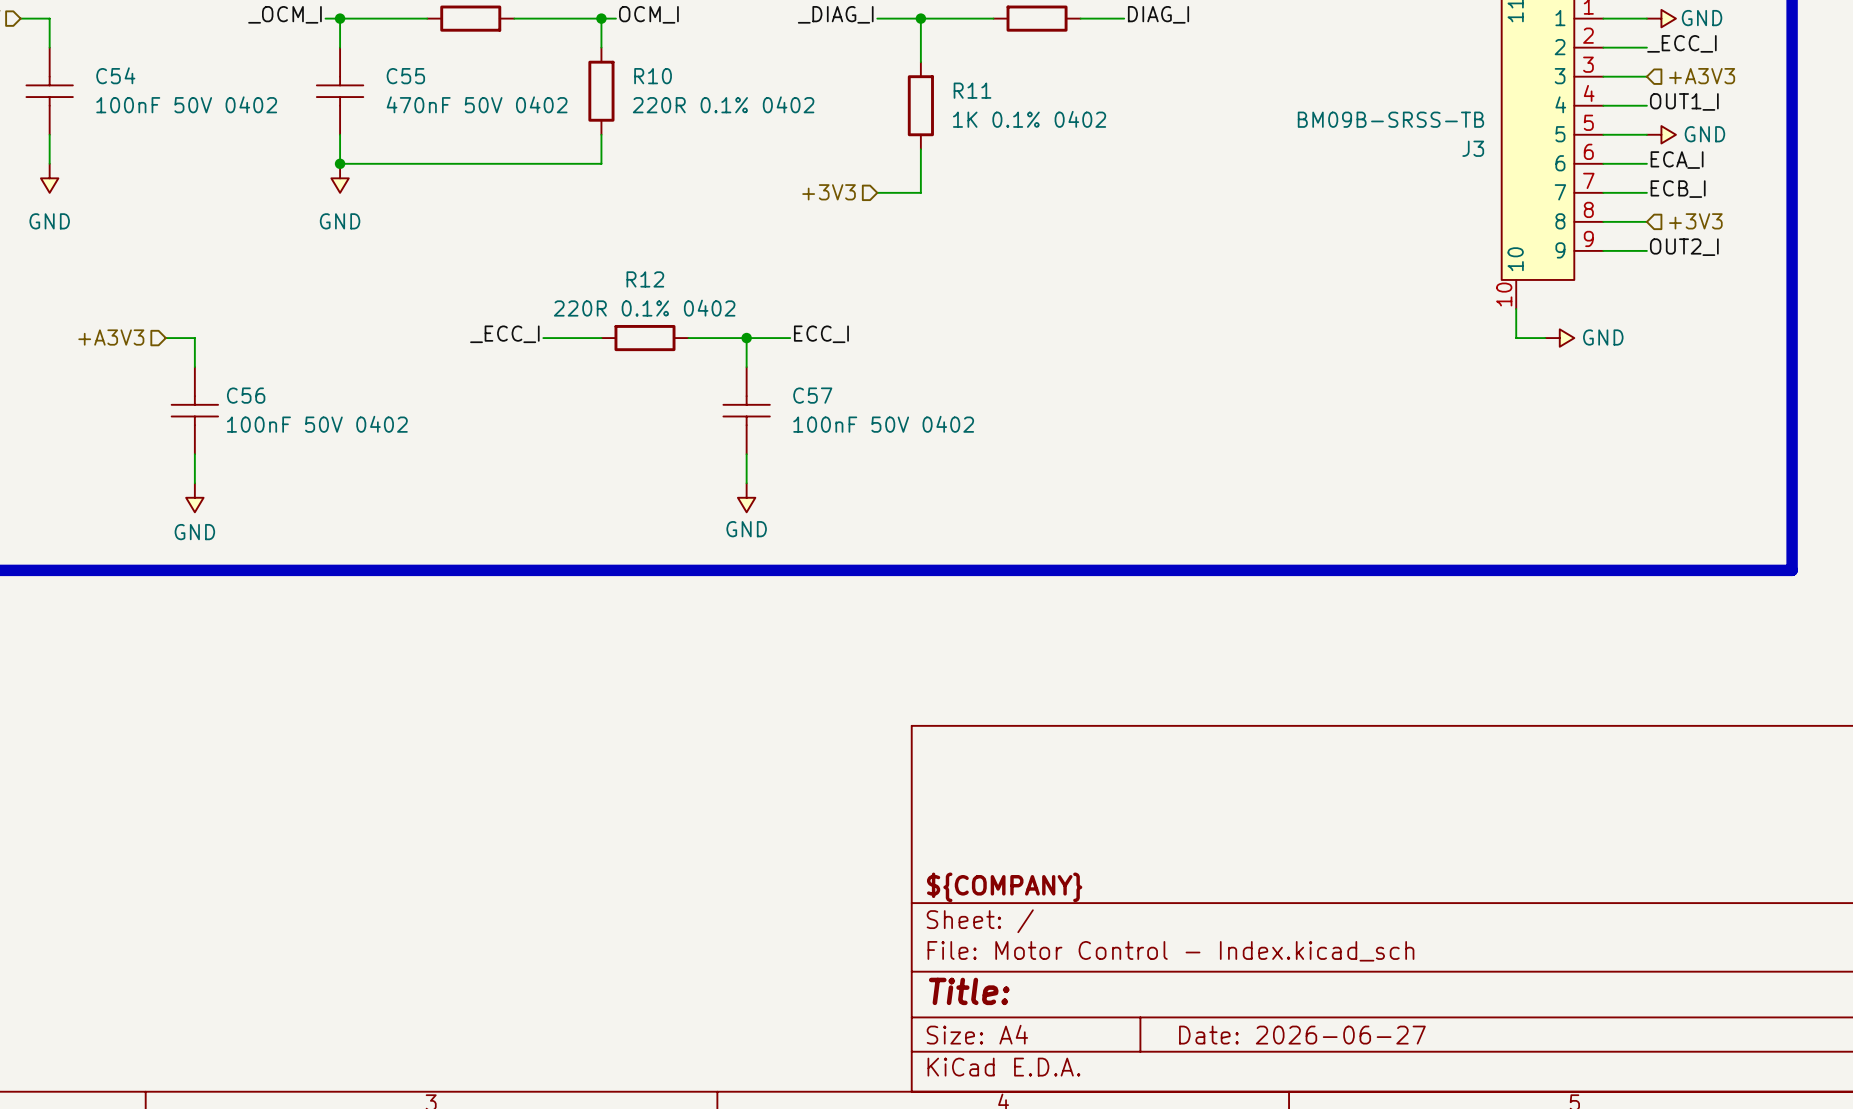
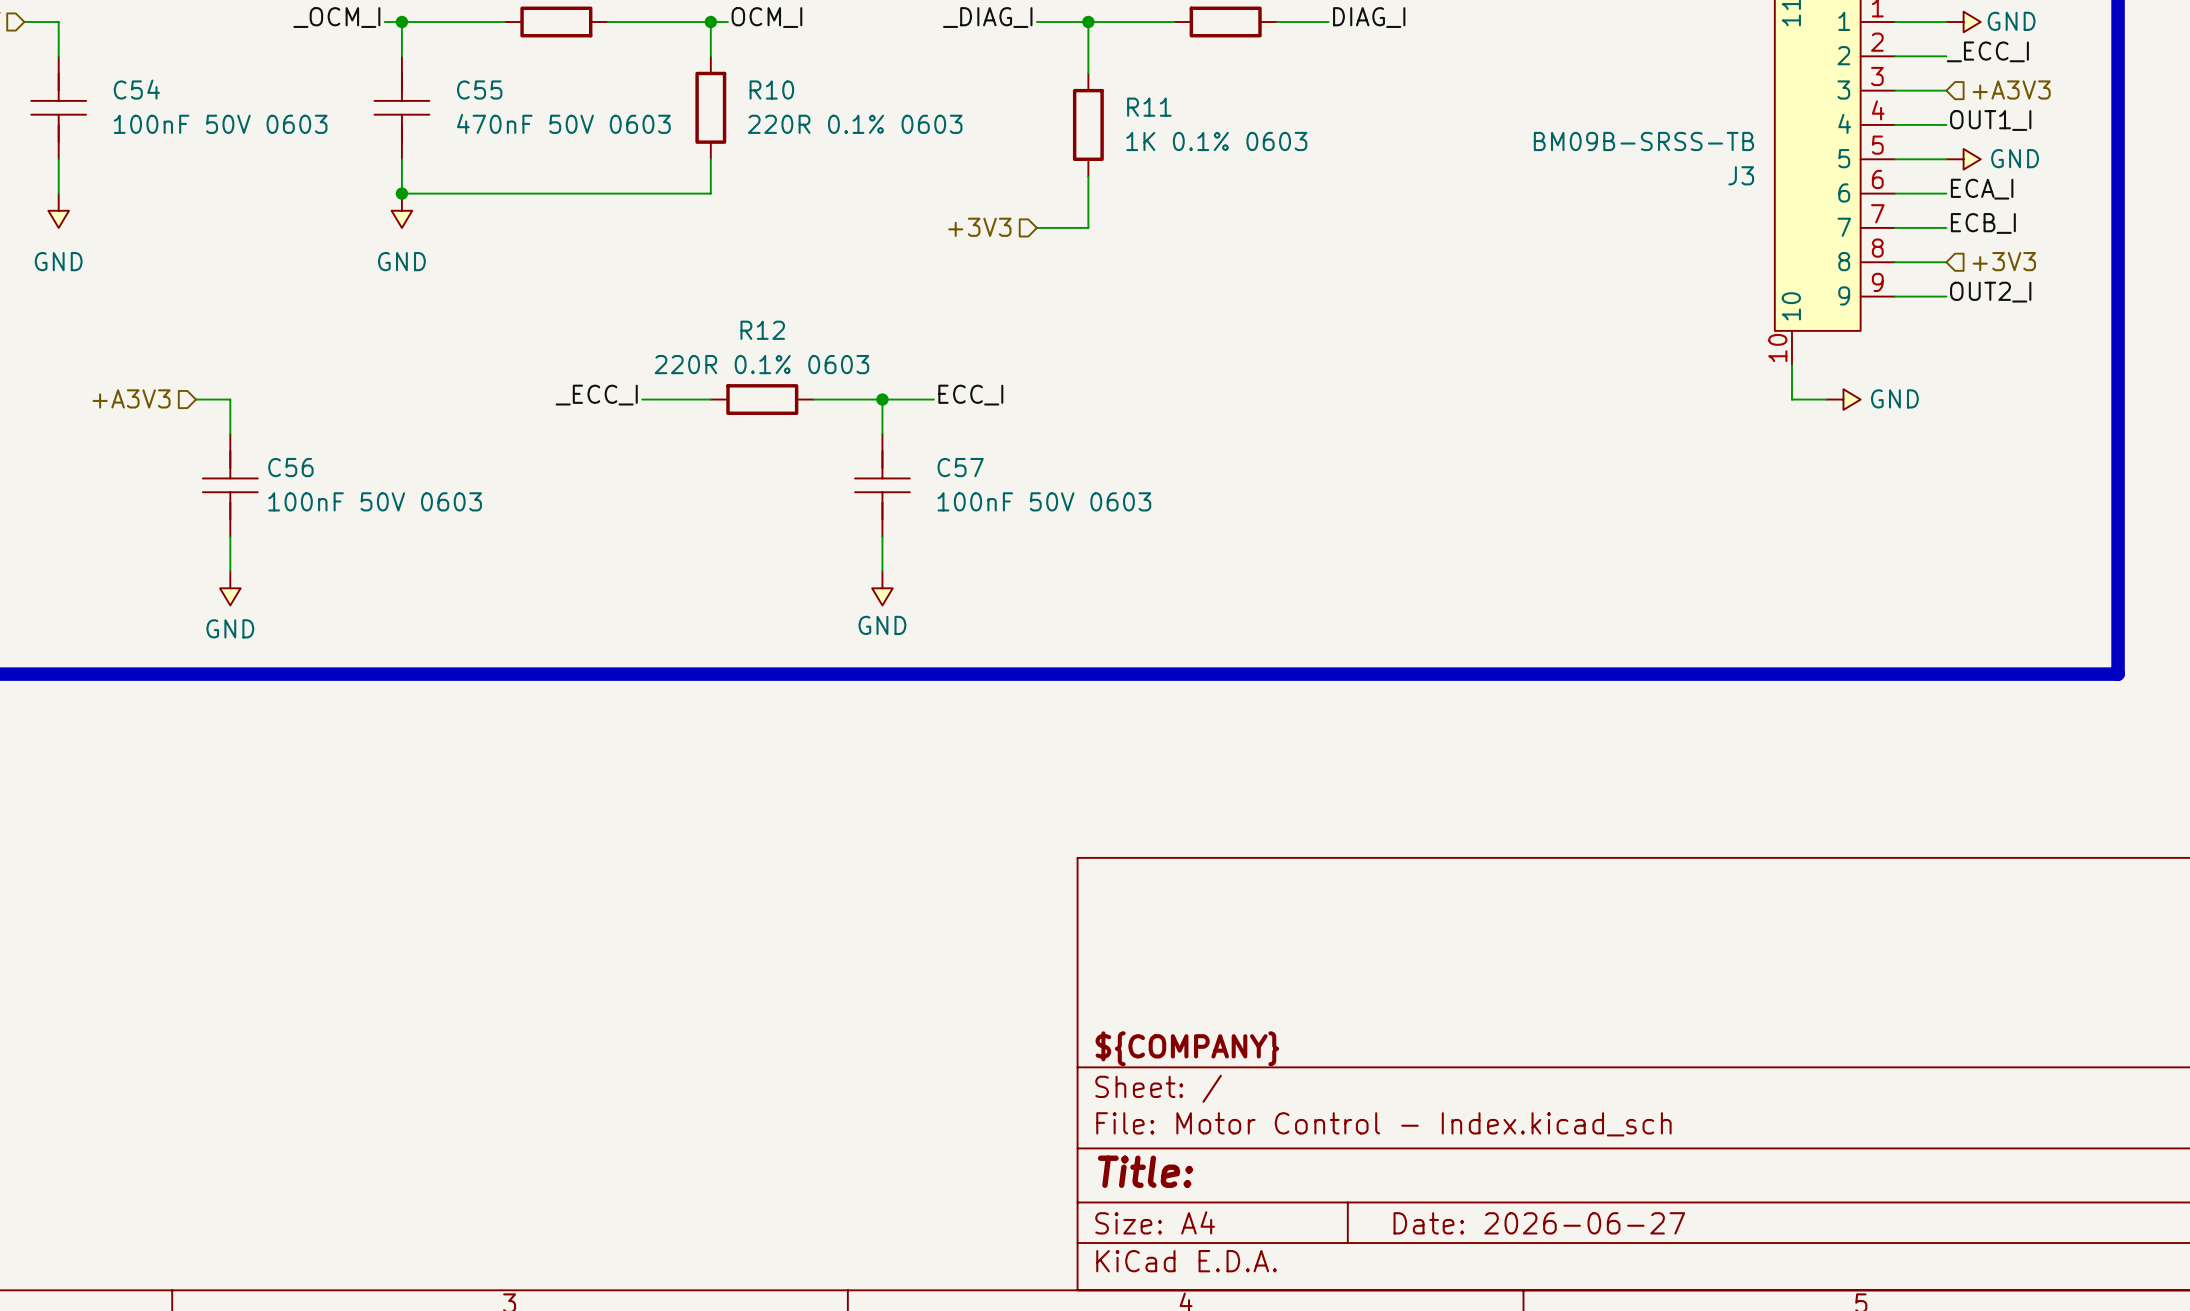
C54 symbol: [26, 47, 73, 135] -> [31, 56, 87, 160]
C55 symbol: [316, 47, 364, 135] -> [374, 56, 430, 160]
C54 value: 100nF 50V 0402 (186, 104) -> 100nF 50V 0603 (220, 124)
C55 value: 470nF 50V 0402 (477, 104) -> 470nF 50V 0603 (563, 123)
R10 value: 220R 0.1% 0402 (723, 104) -> 220R 0.1% 0603 (855, 124)
R11 value: 1K 0.1% 0402 (1029, 119) -> 1K 0.1% 0603 (1216, 141)
R12 value: 220R 0.1% 0402 (644, 308) -> 220R 0.1% 0603 (761, 364)
C56 symbol: [171, 367, 219, 455] -> [202, 433, 258, 537]
C57 symbol: [723, 367, 770, 455] -> [855, 433, 910, 537]
C56 value: 100nF 50V 0402 (317, 424) -> 100nF 50V 0603 (375, 501)
C57 value: 100nF 50V 0402 (883, 424) -> 100nF 50V 0603 (1044, 501)

